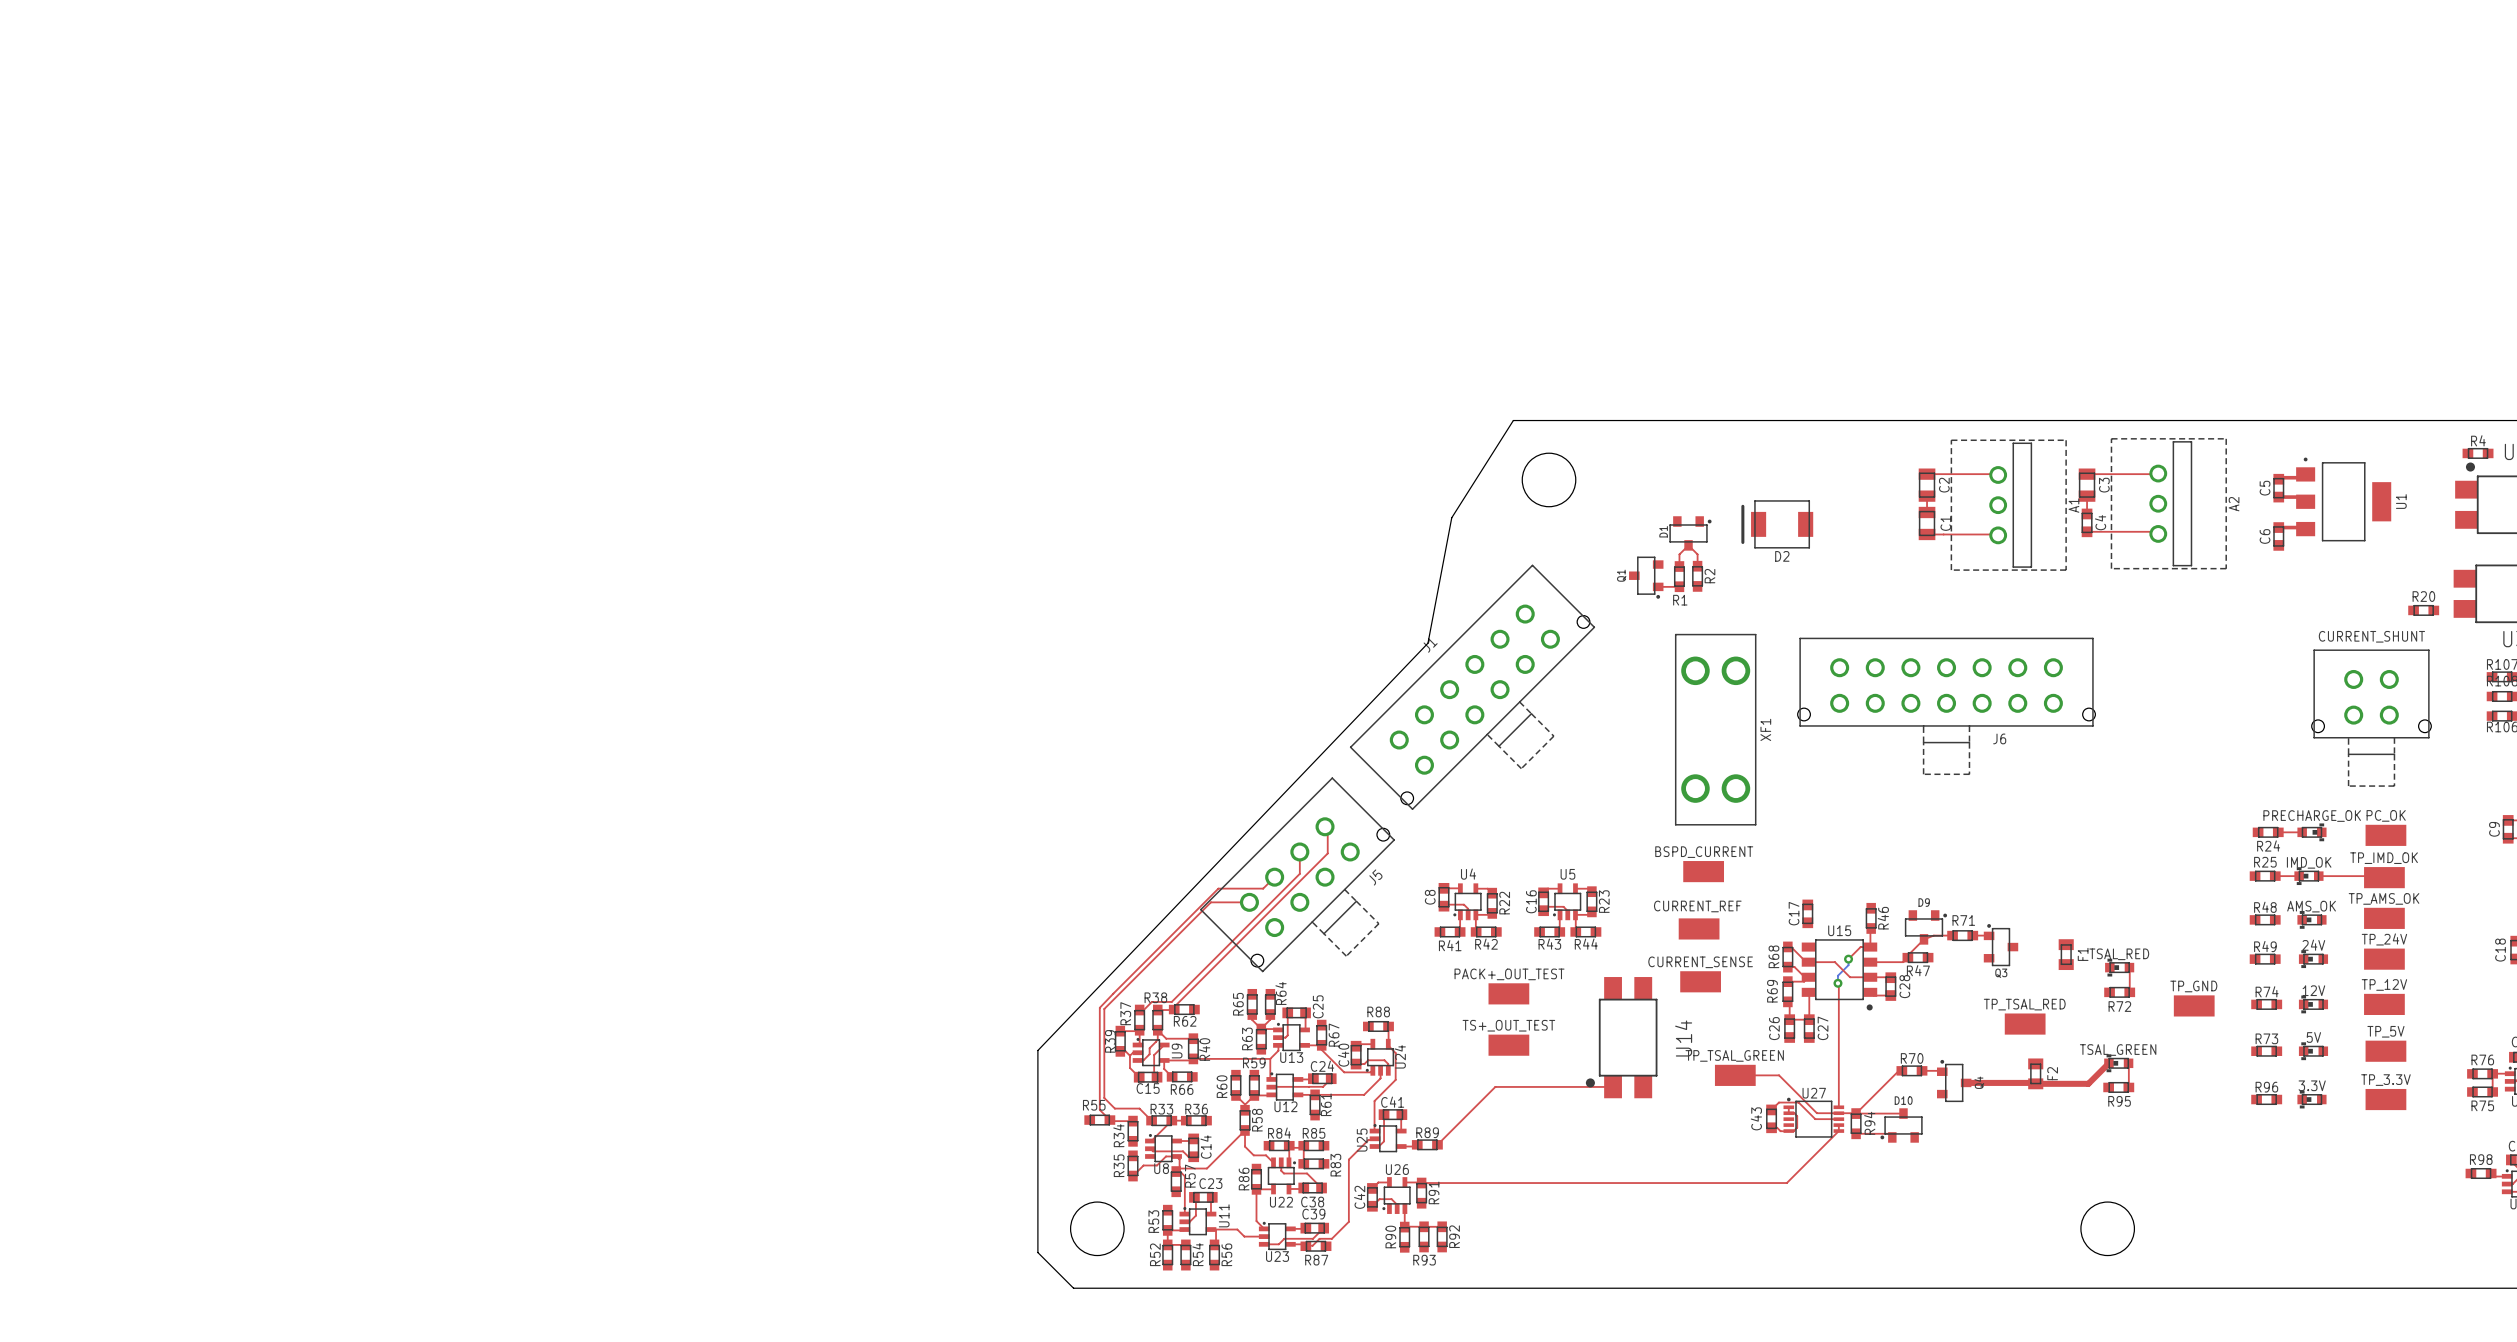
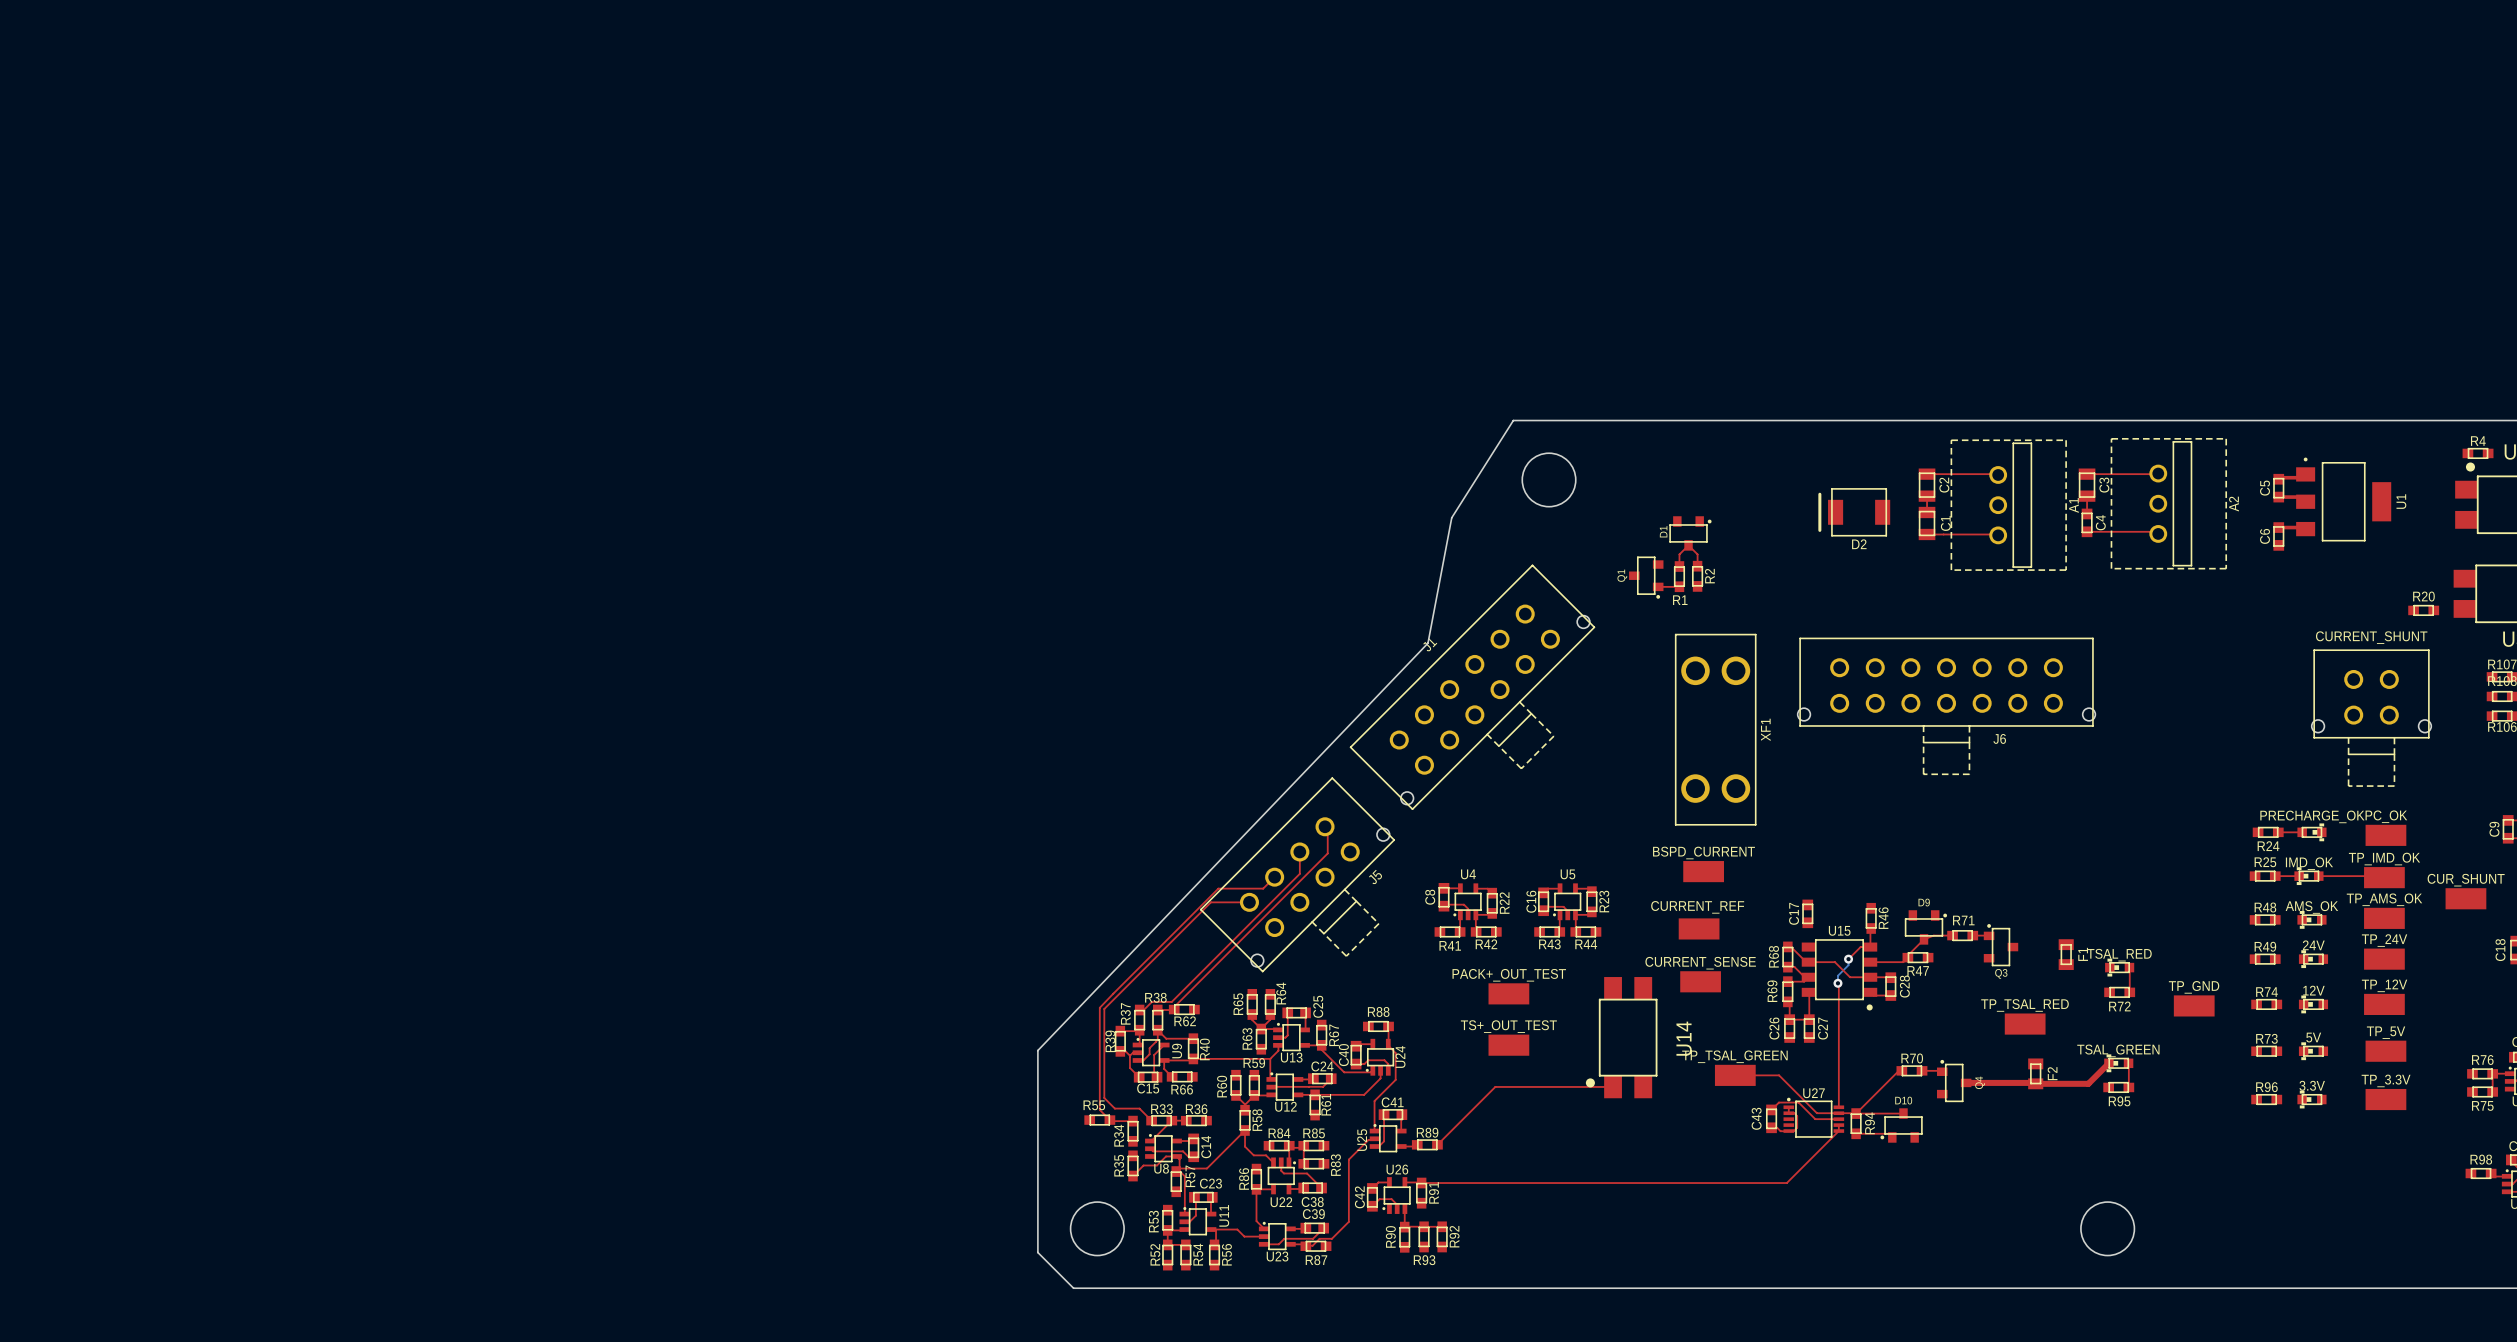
D2 position: (1777, 524) -> (1854, 512)
CUR_SHUNT: none -> (2465, 898)

